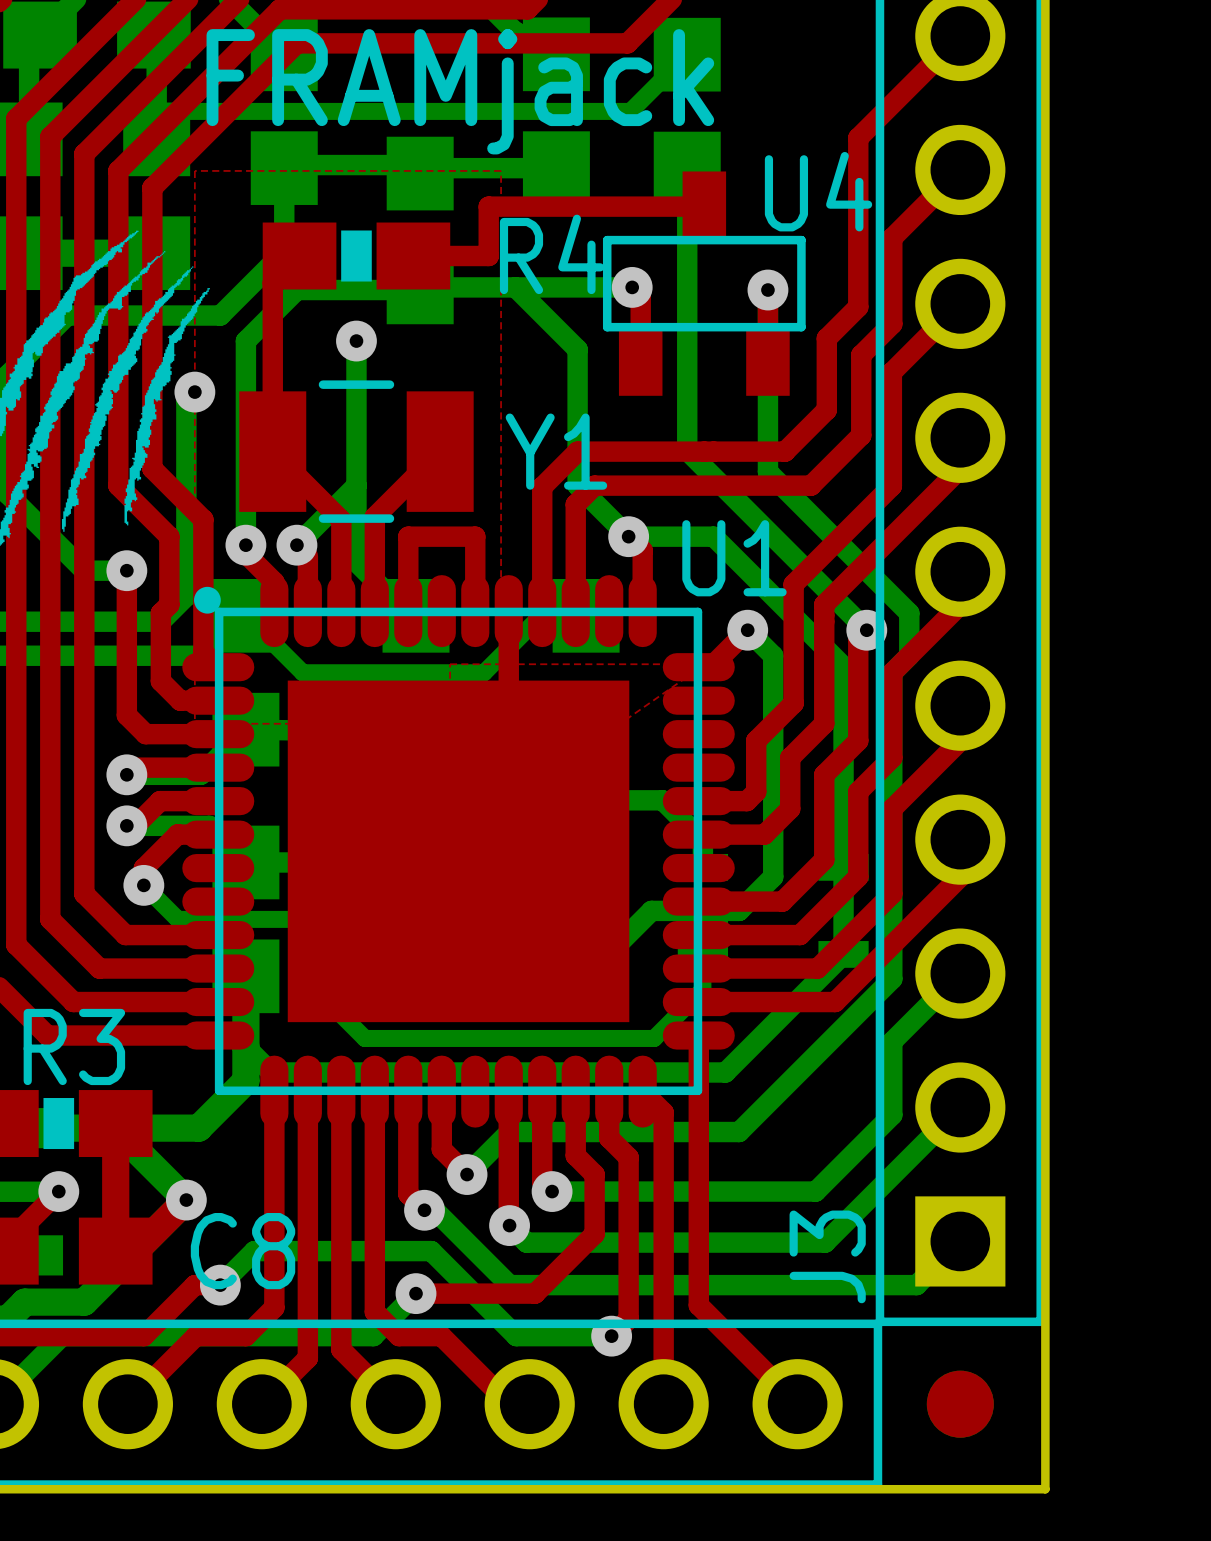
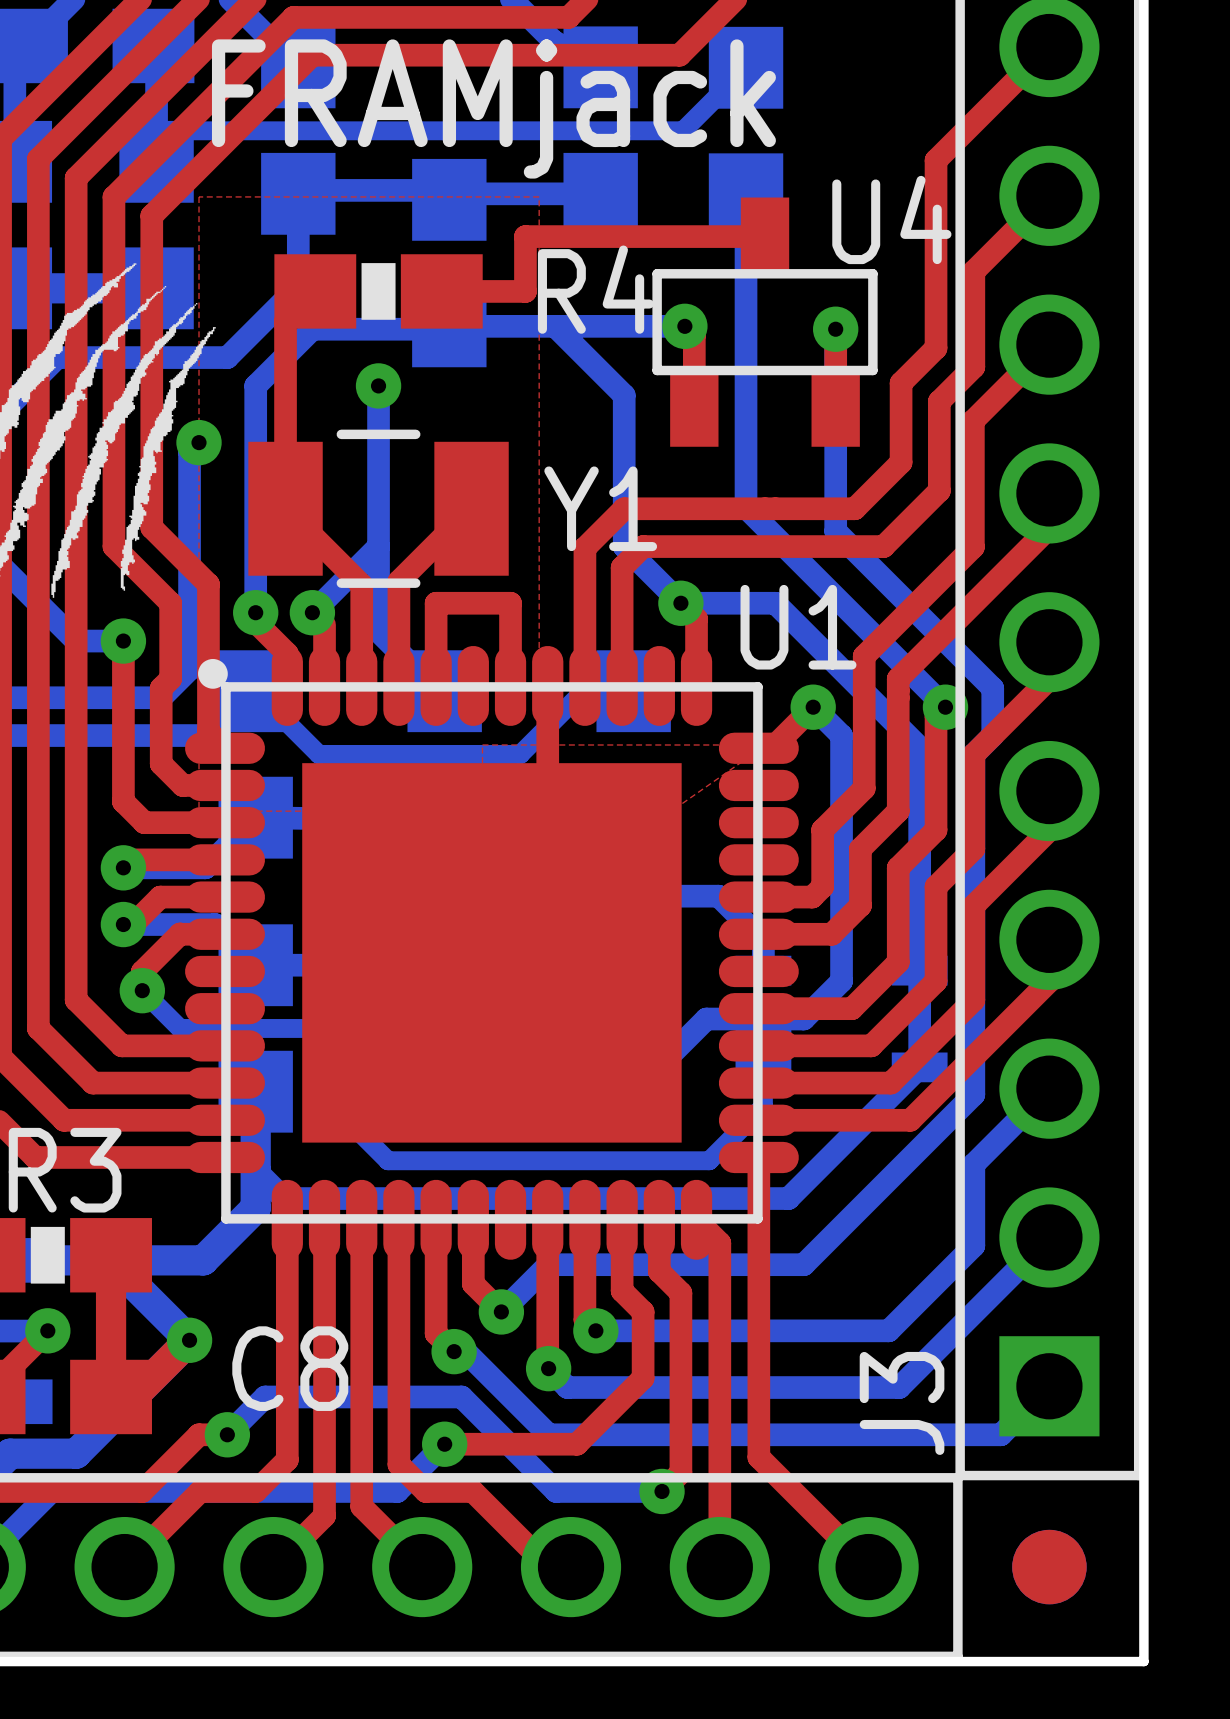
C8 name position: C8 (243, 1251) -> C8 (290, 1368)

